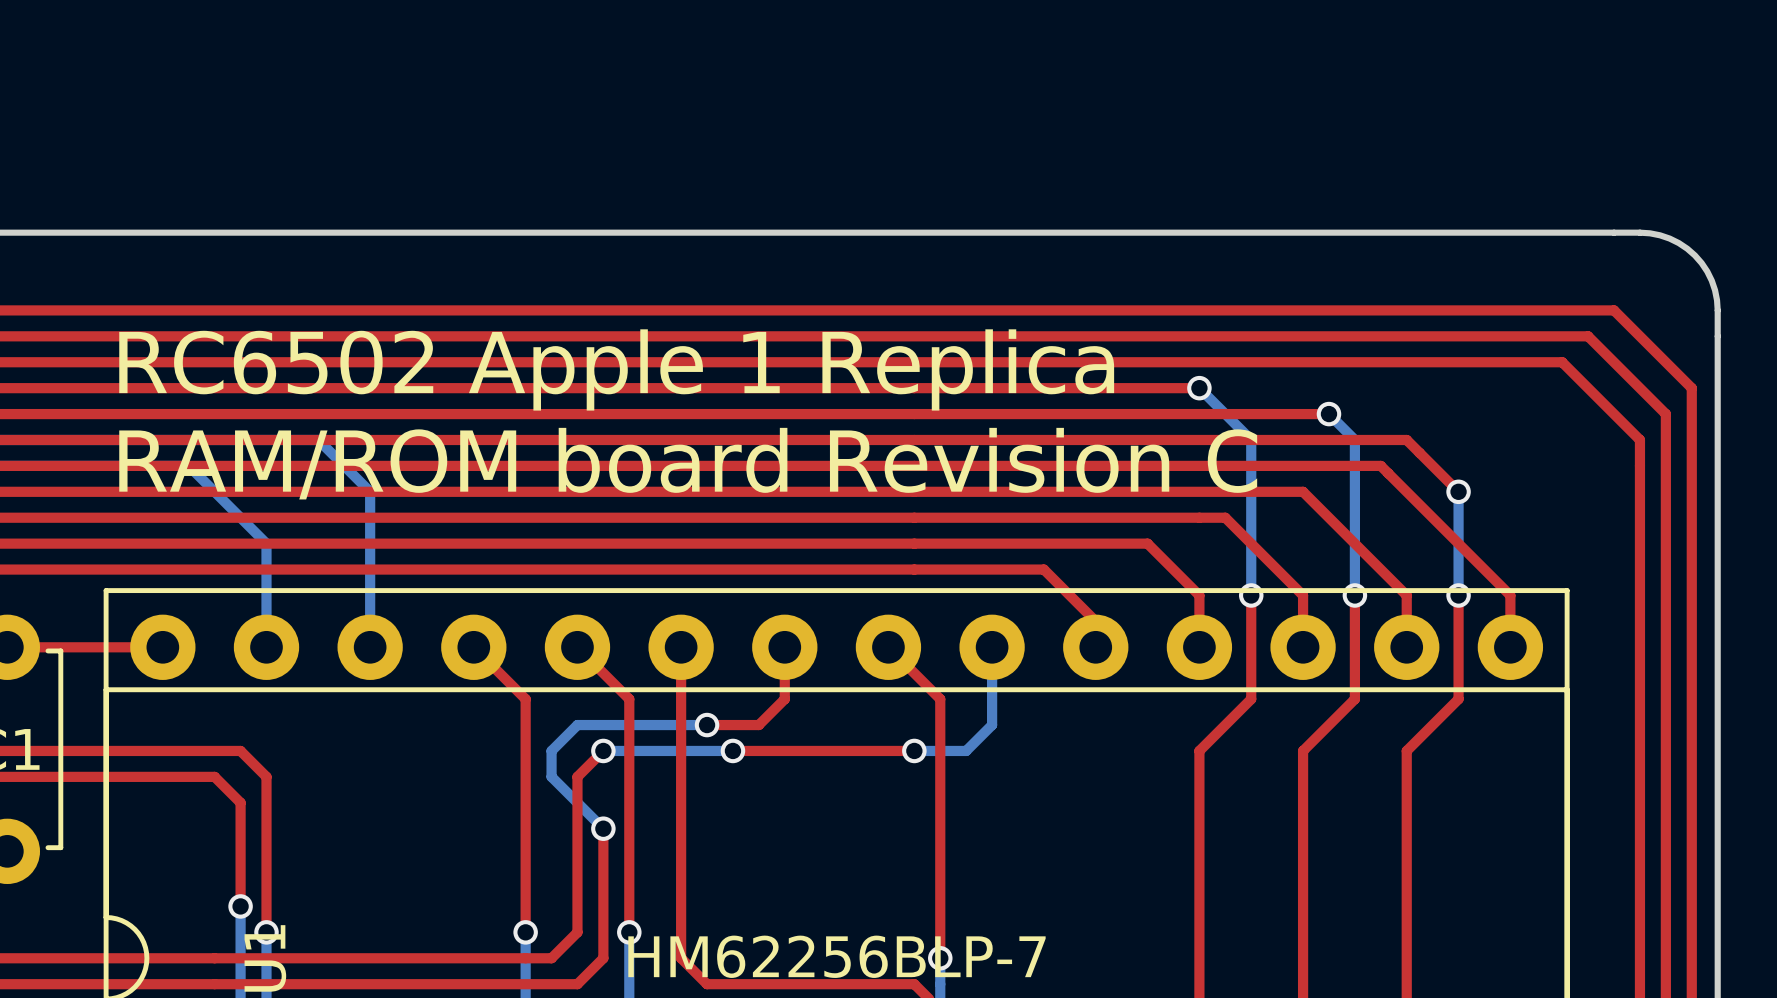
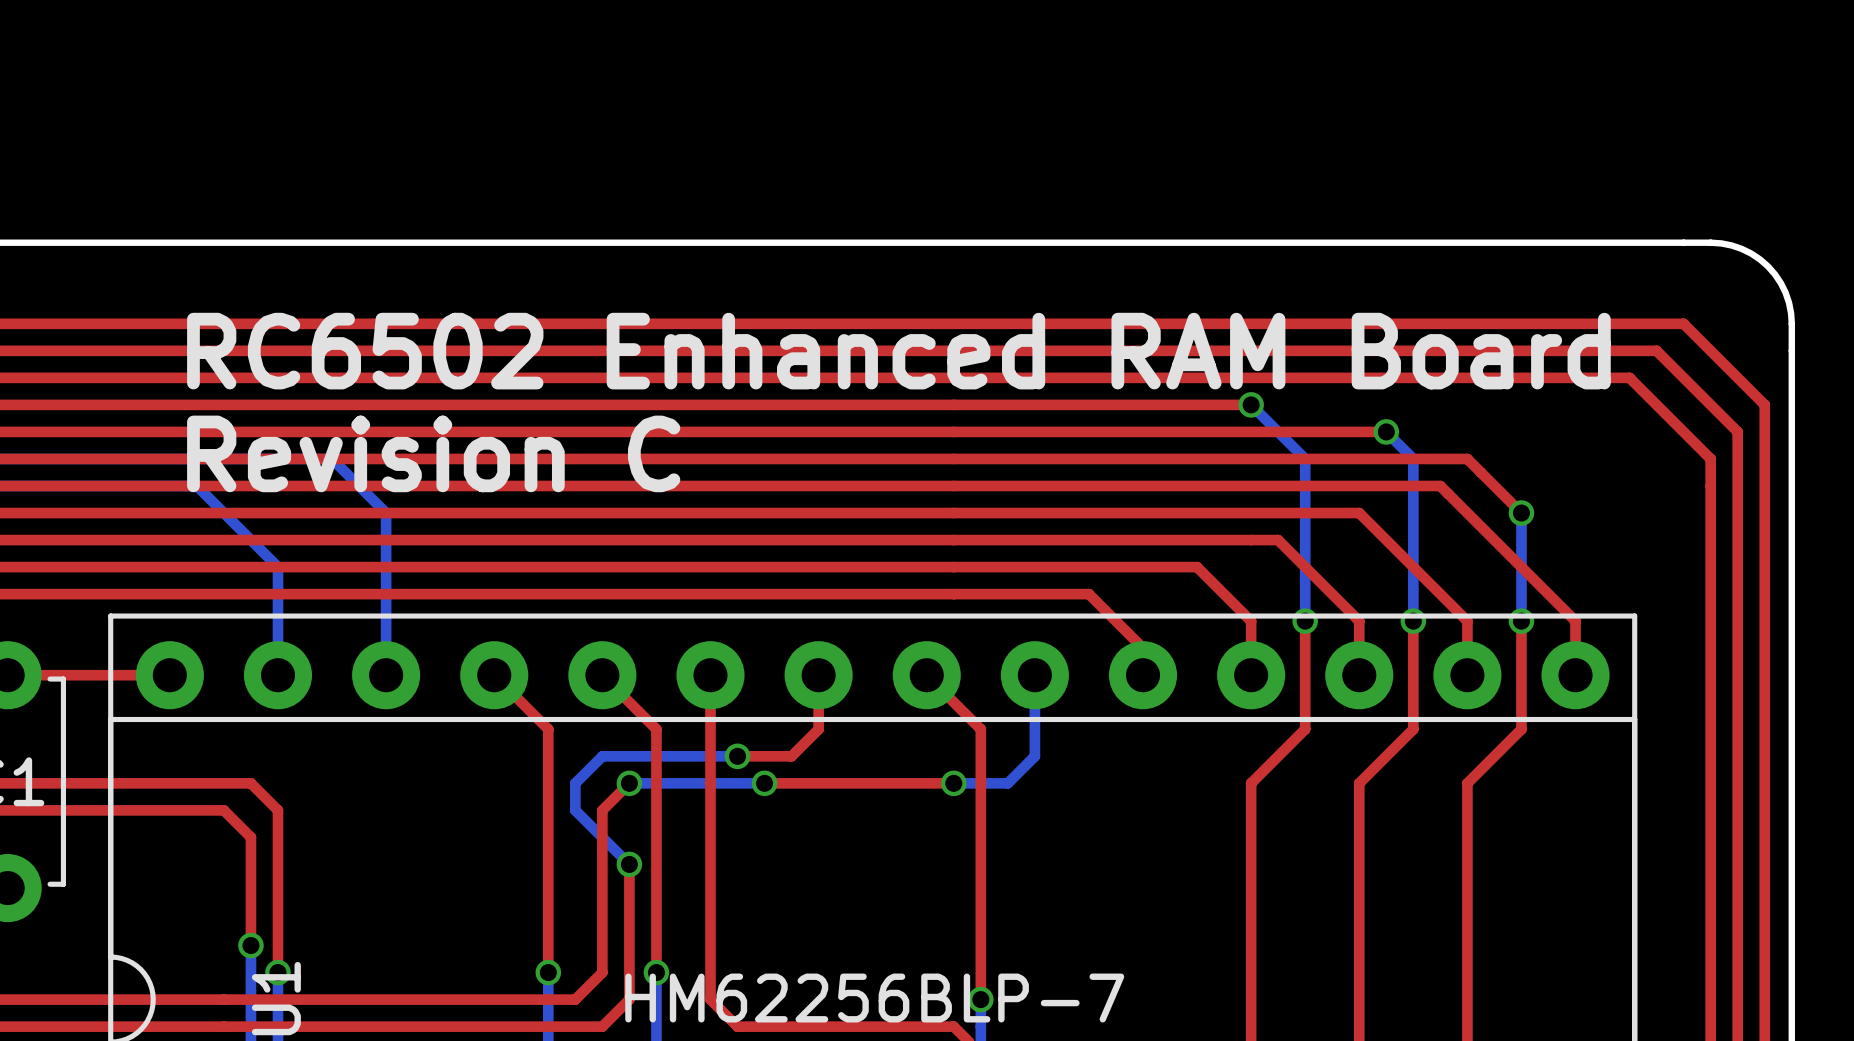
text: none -> RC6502 Enhanced RAM Board (898, 351)
text: RC6502 Apple 1 Replica (616, 369) -> none
text: none -> Revision C (433, 453)
text: RAM/ROM board Revision C (688, 463) -> none

